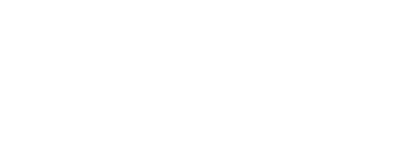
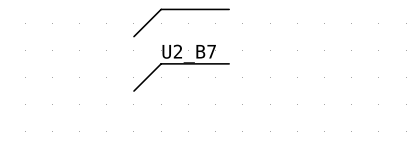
wire: none -> (229, 9) (161, 9) (133, 36)
label: none -> U2_B7 (189, 53)
wire: none -> (229, 63) (161, 63) (133, 91)

